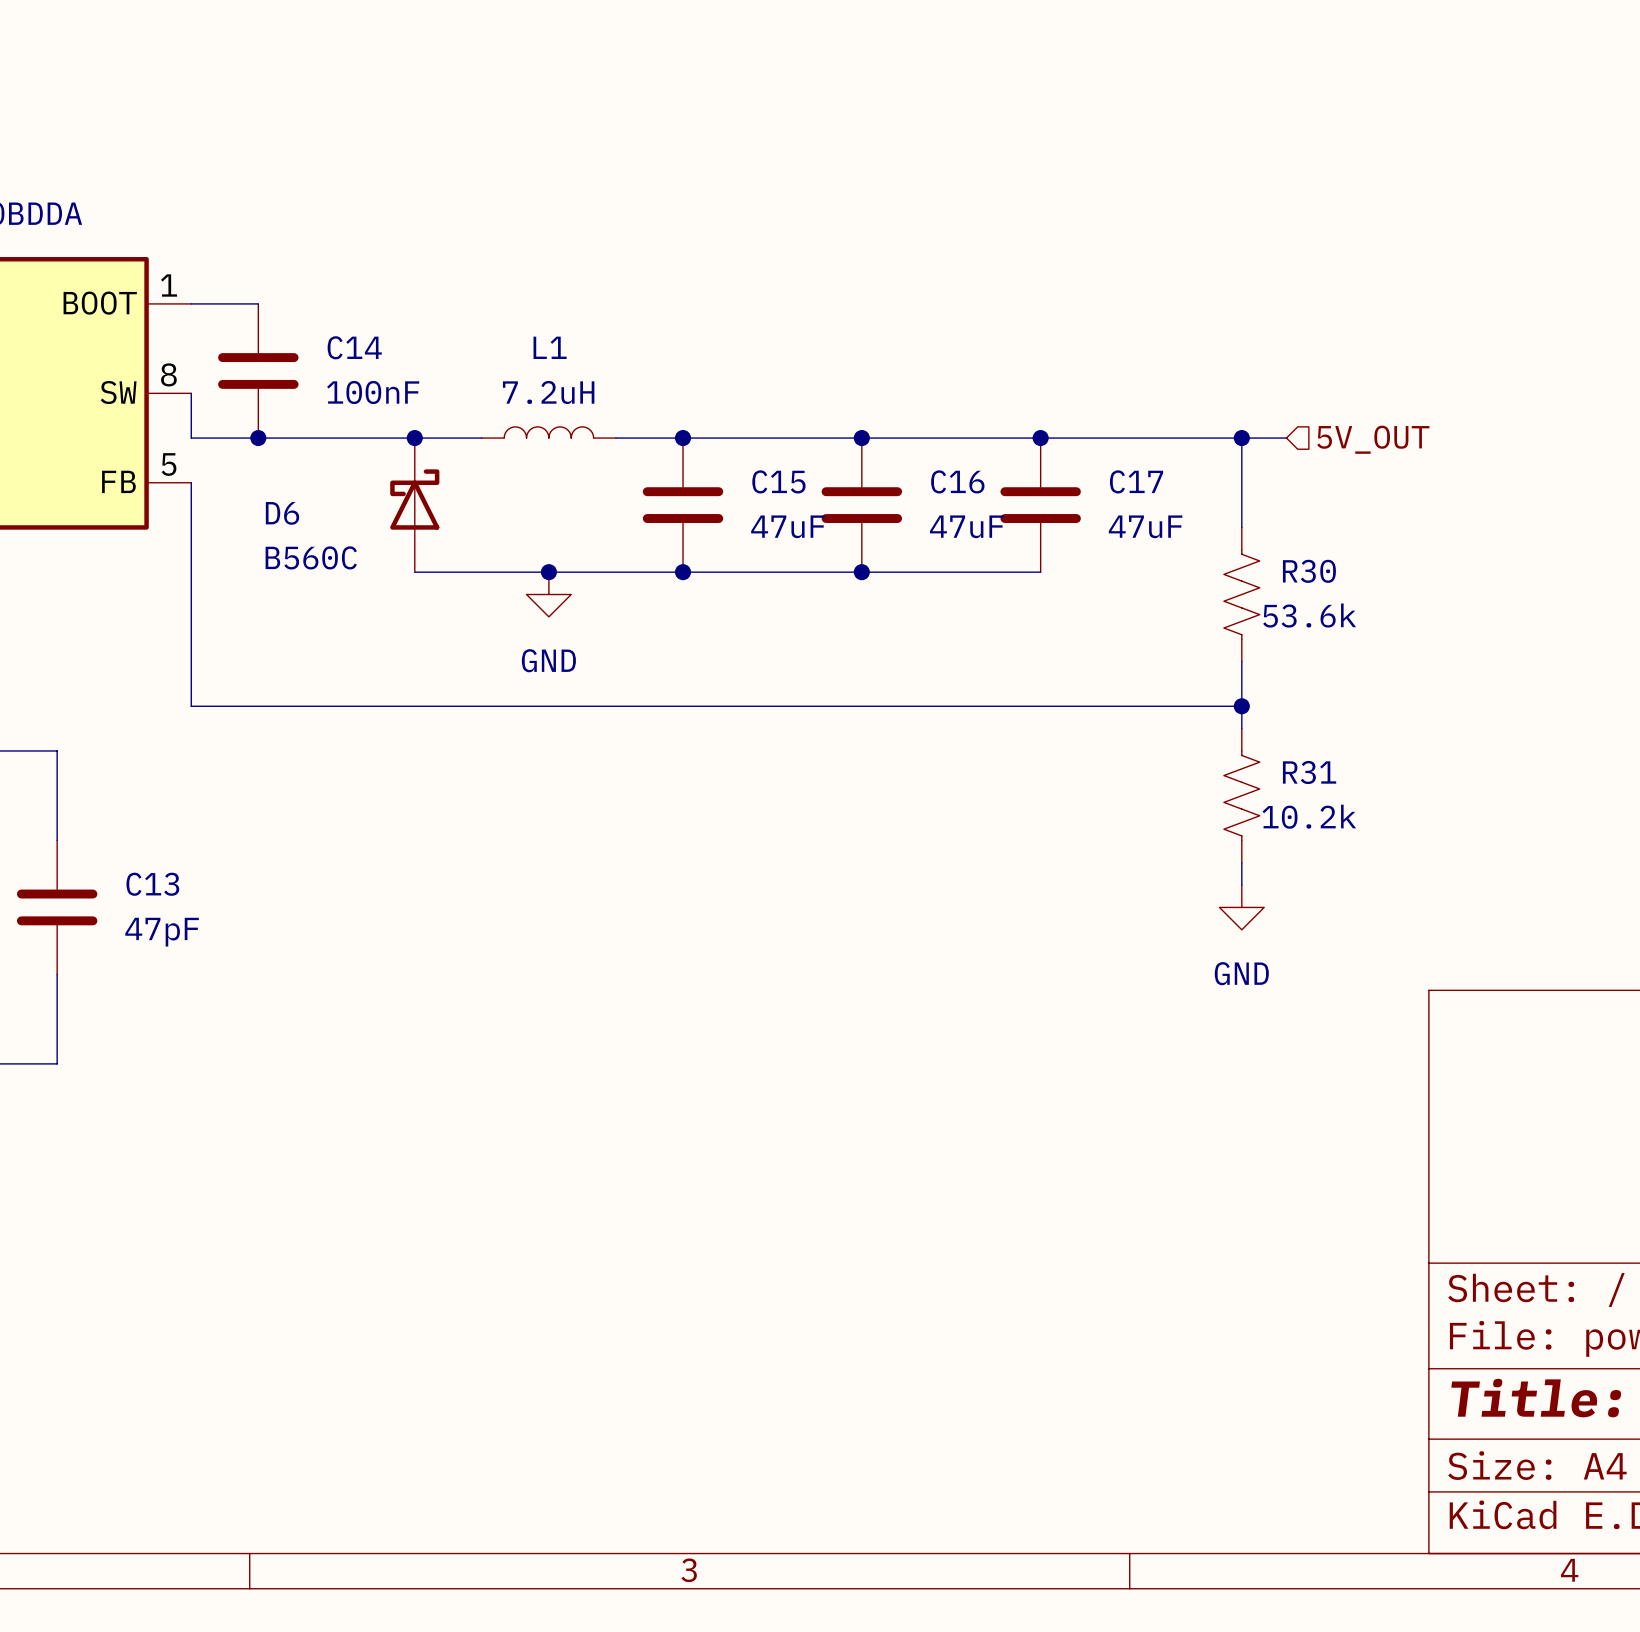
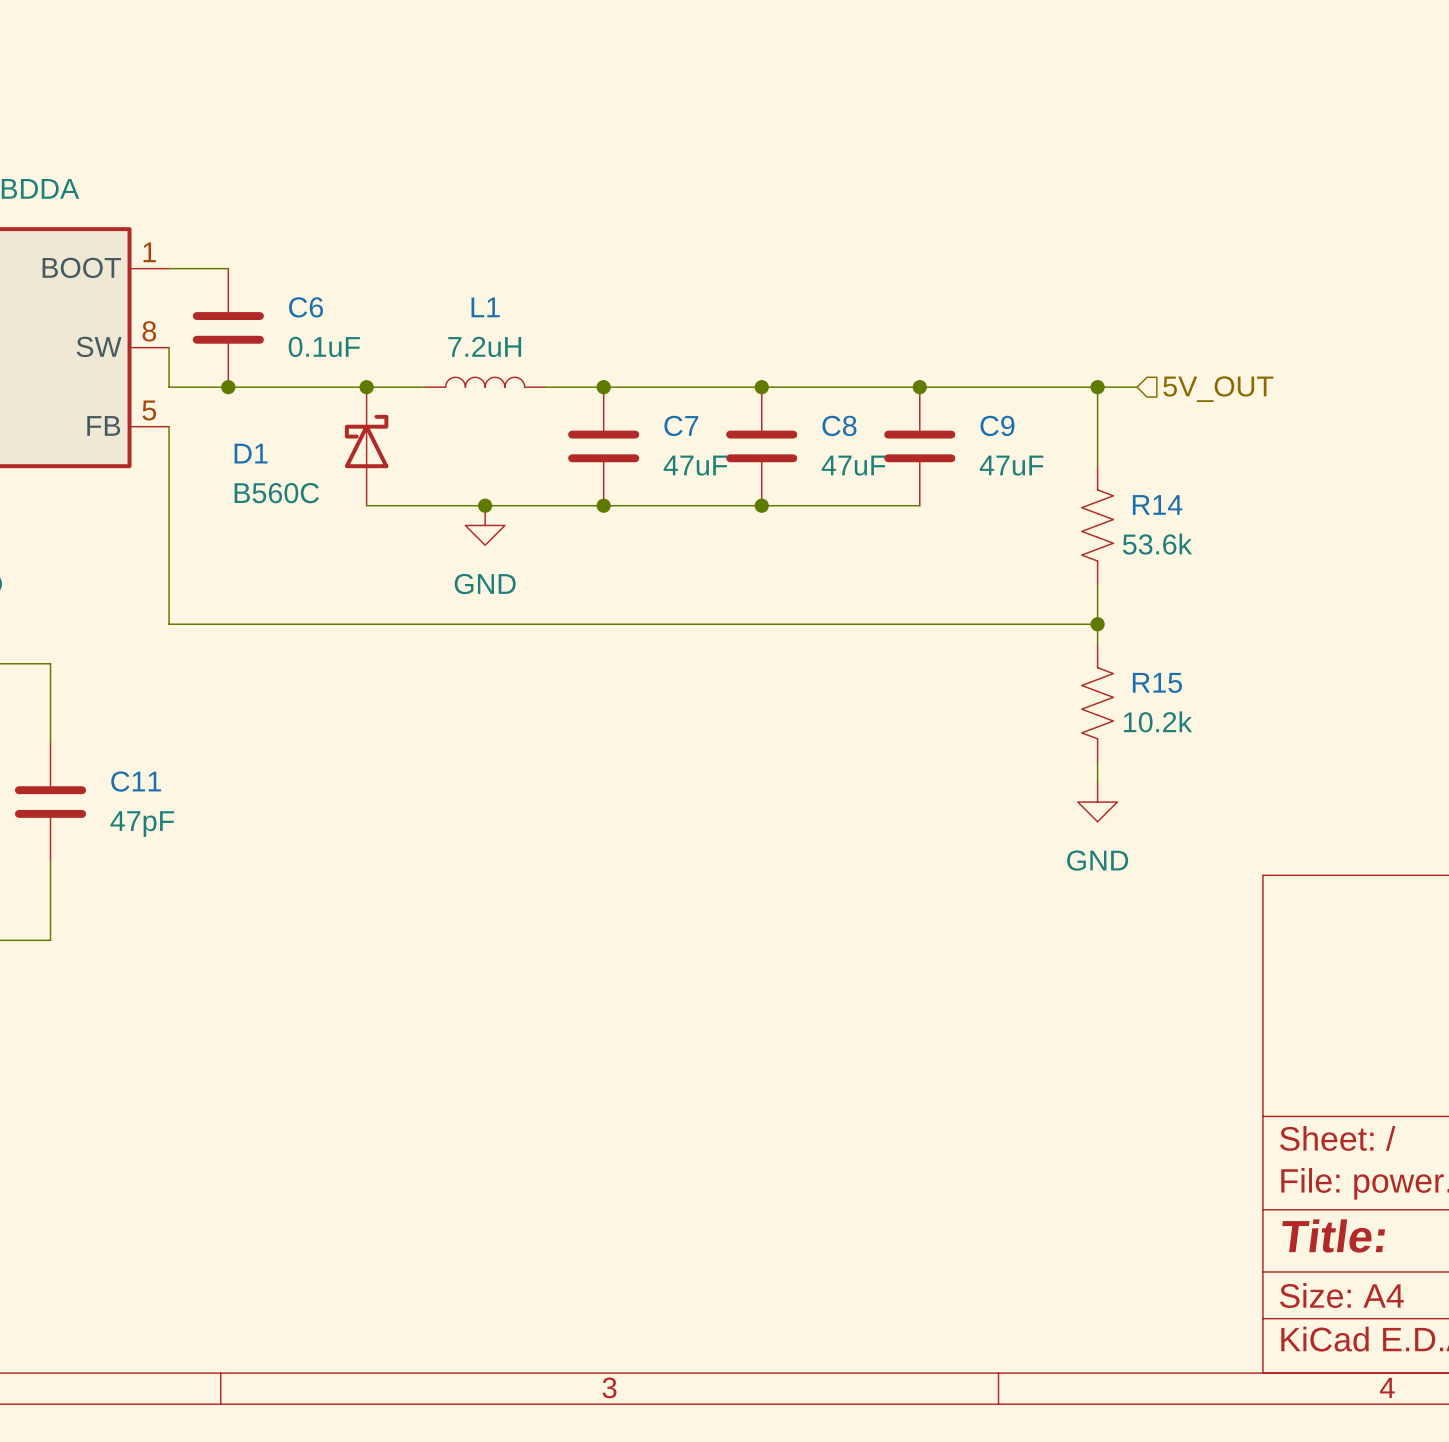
C14 name: C14 (354, 347) -> C6 (306, 307)
C14 value: 100nF (373, 392) -> 0.1uF (324, 346)
C15 name: C15 (778, 481) -> C7 (681, 425)
C16 name: C16 (957, 481) -> C8 (839, 425)
C17 name: C17 (1136, 481) -> C9 (997, 425)
D6 name: D6 (282, 513) -> D1 (251, 453)
R30 name: R30 (1309, 571) -> R14 (1157, 504)
R31 name: R31 (1309, 772) -> R15 (1157, 682)
C13 name: C13 (152, 884) -> C11 (136, 781)

